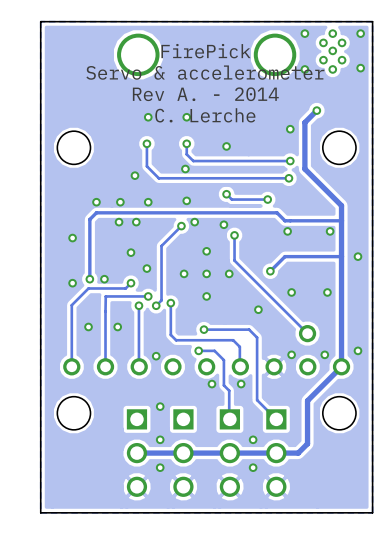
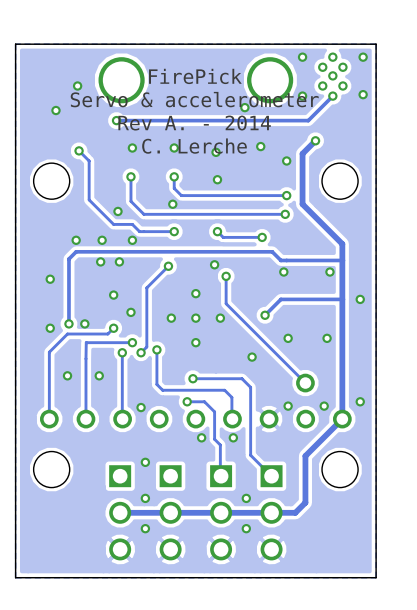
part: none -> (77, 86)
track: none -> (332, 96) (308, 120) (116, 120)
part: none -> (244, 107)
part: none -> (55, 110)
via: none -> (116, 120)
part: none -> (260, 146)
track: none -> (79, 150) (89, 160) (89, 199) (113, 224) (132, 224) (139, 231) (174, 231)
via: none -> (79, 150)
part: none -> (216, 152)
via: none -> (174, 231)
part: (186, 200) -> none
part: (194, 222) -> none

